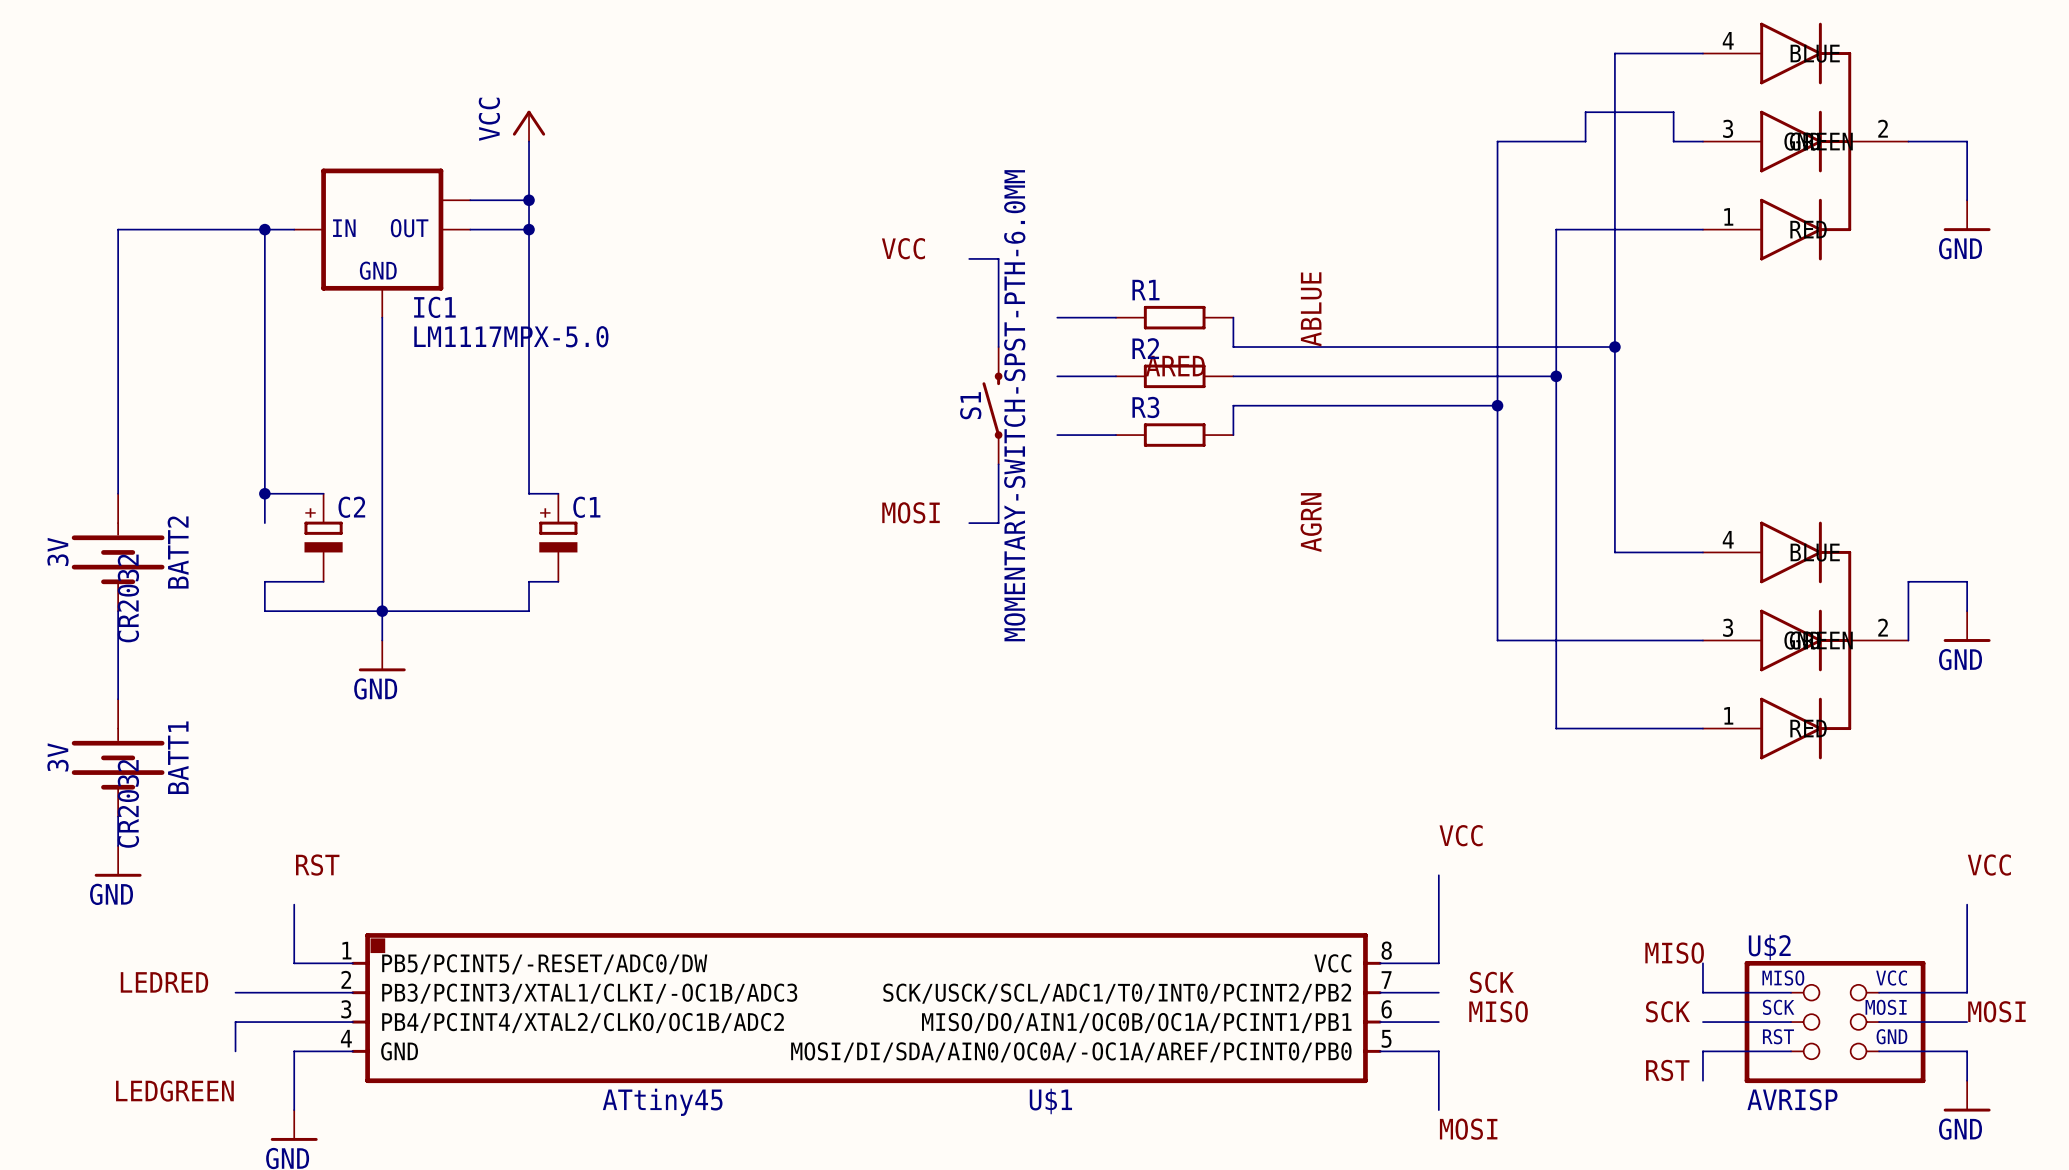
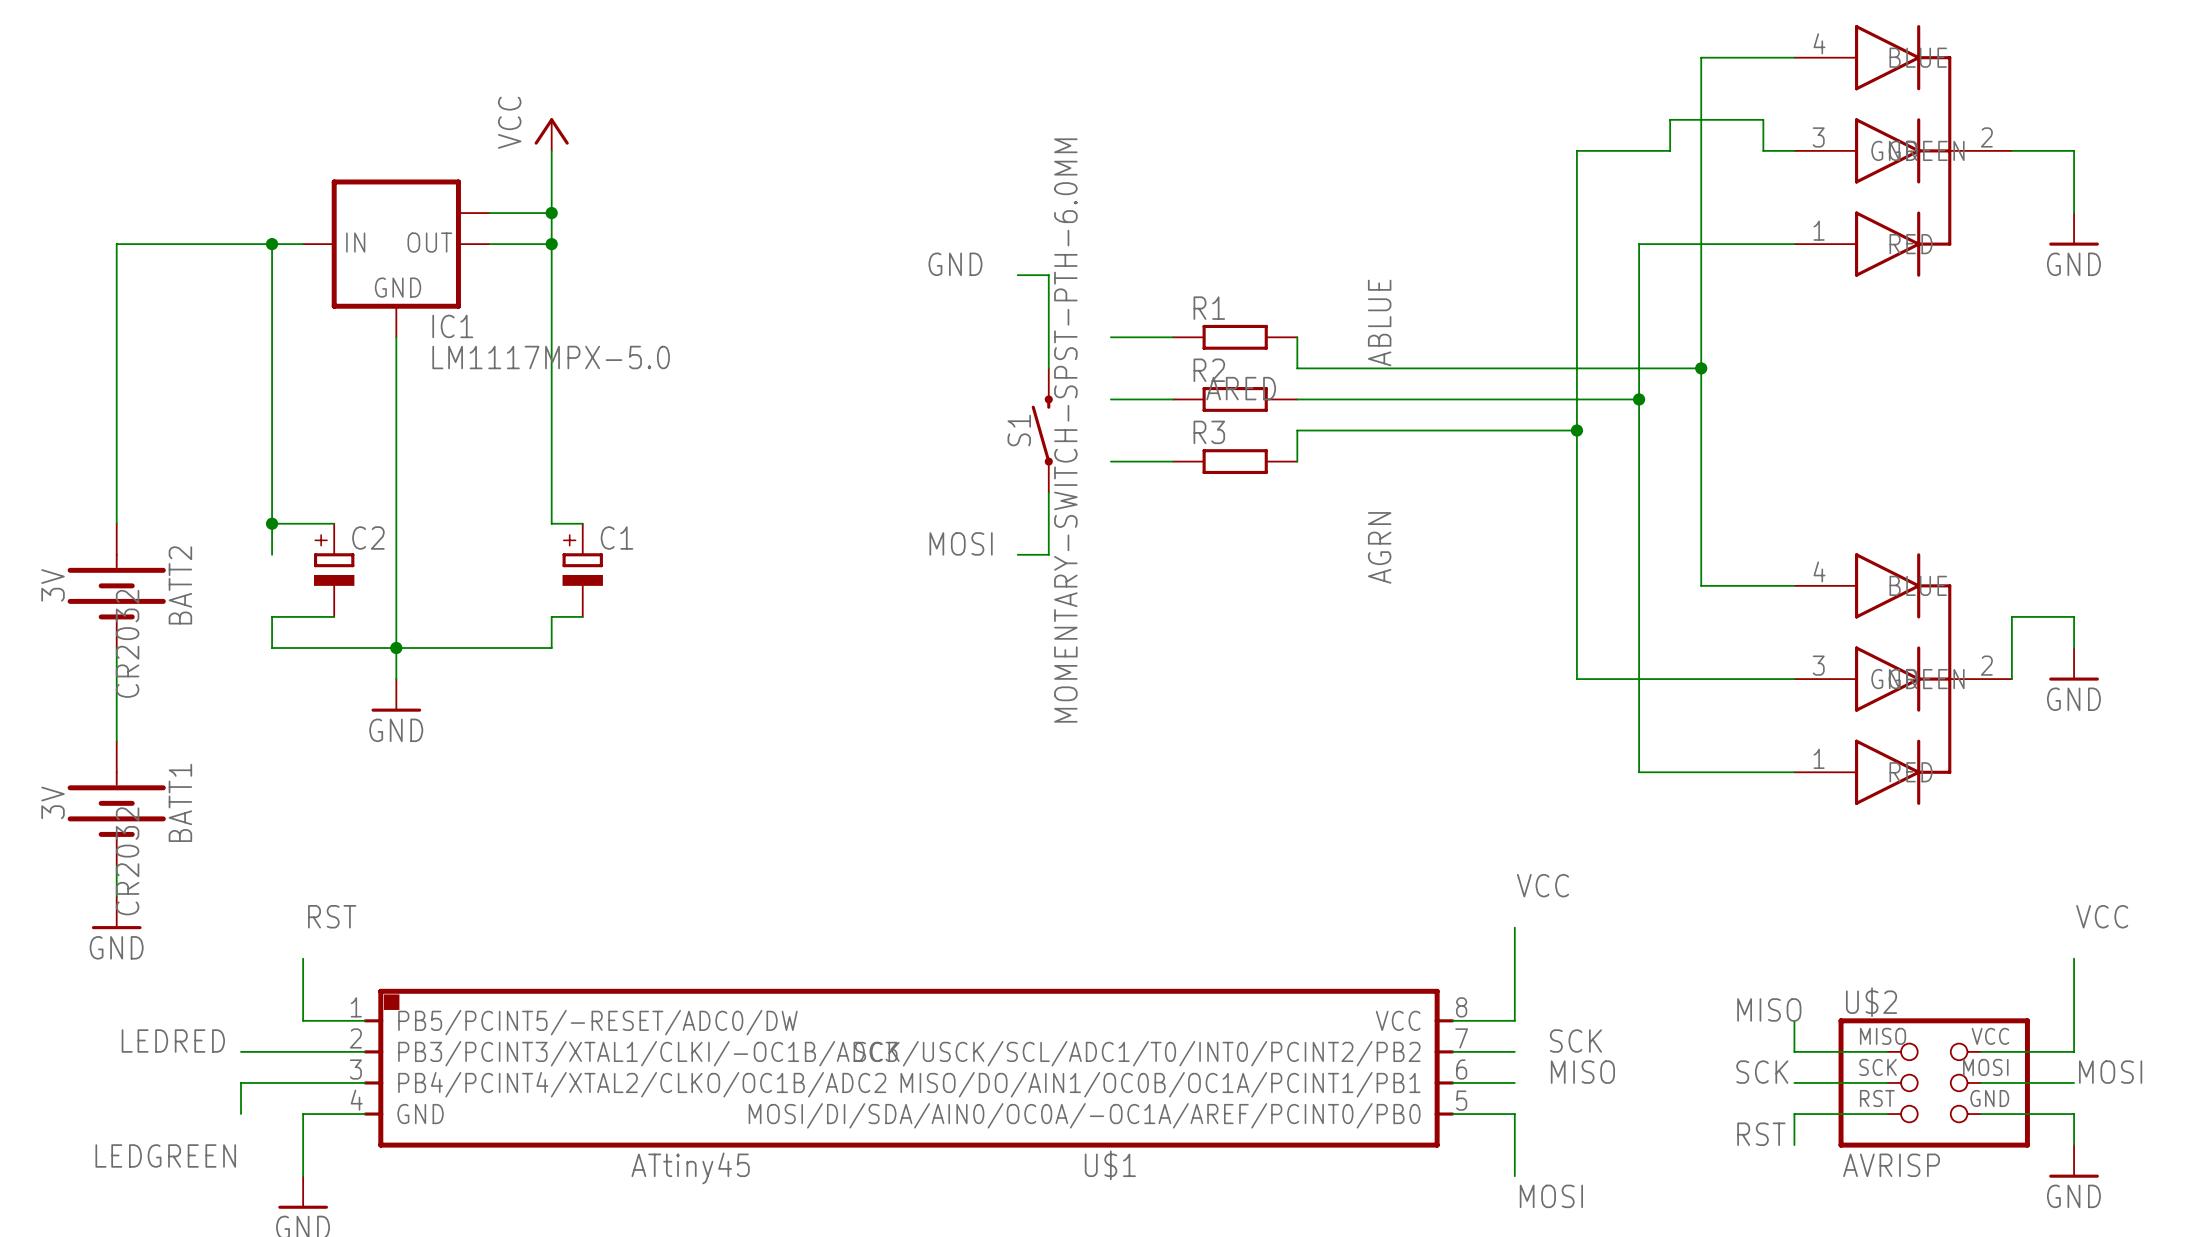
label: VCC (903, 248) -> GND (955, 264)

